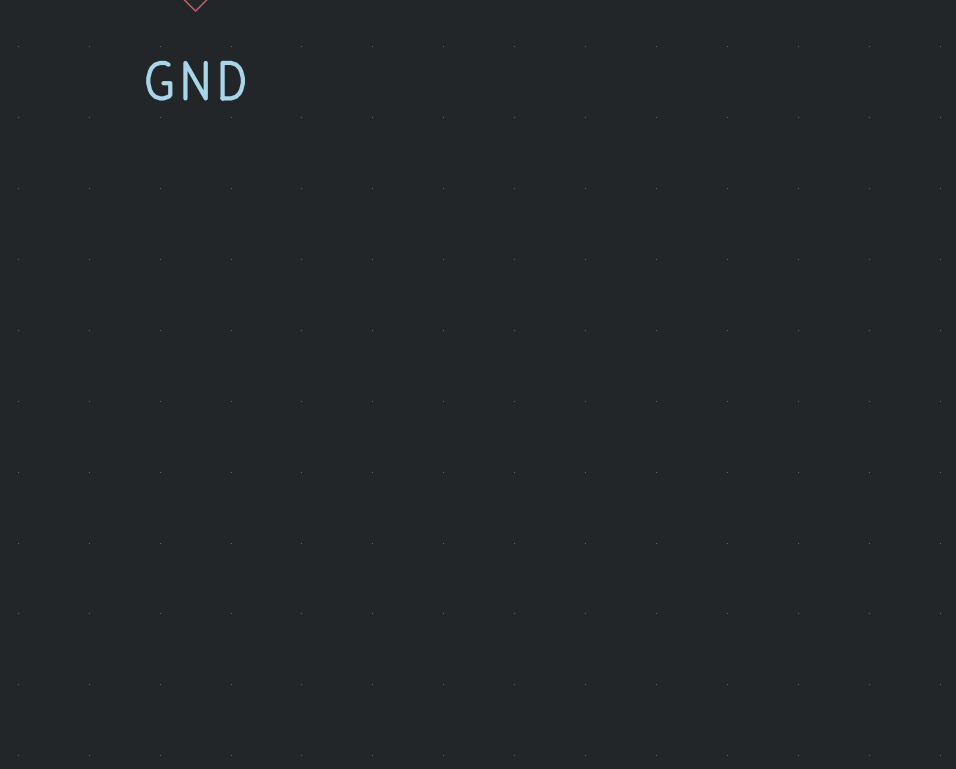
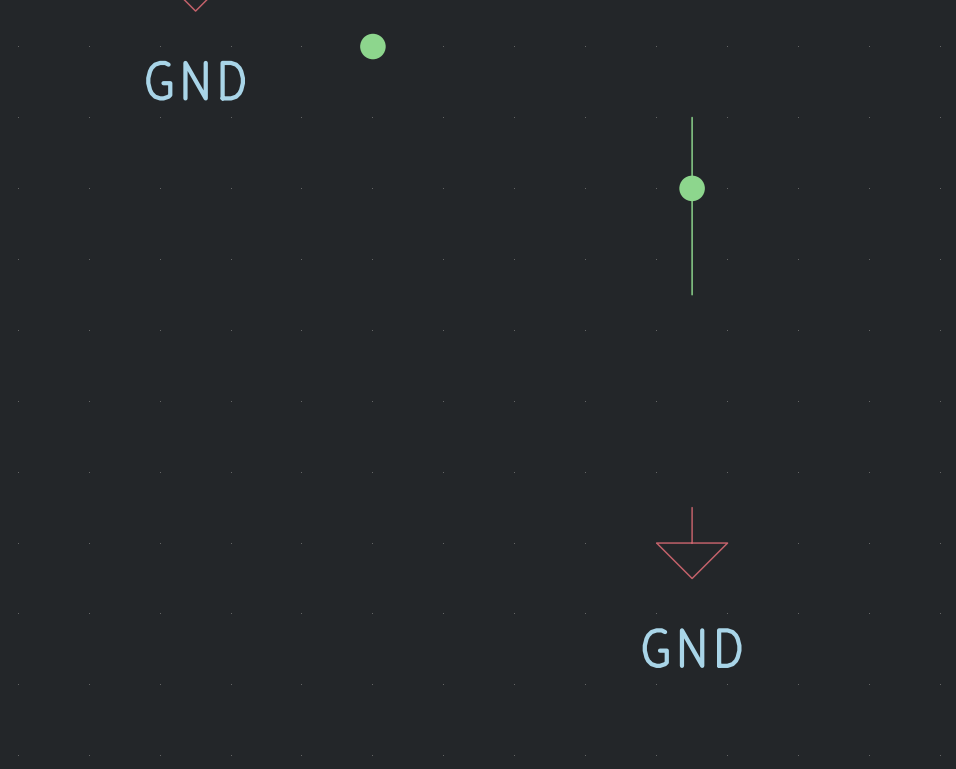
junction: none -> (372, 46)
wire: none -> (692, 117) (692, 294)
junction: none -> (692, 188)
power symbol: none -> GND (692, 543)

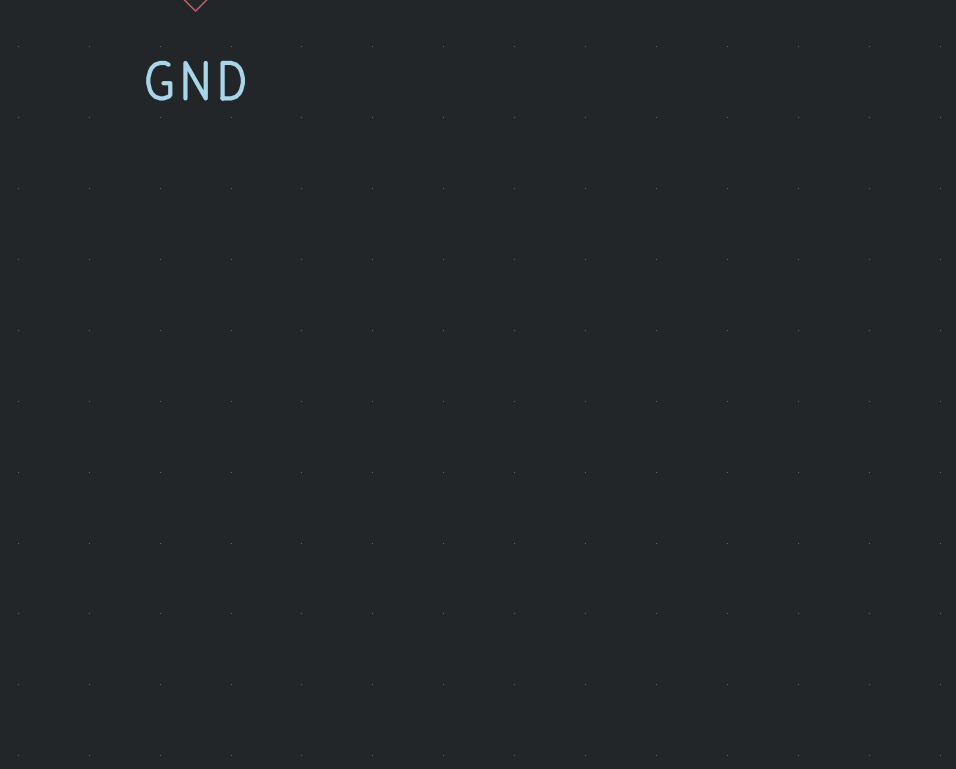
junction: (372, 46) -> none
wire: (692, 117) (692, 294) -> none
junction: (692, 188) -> none
power symbol: GND (692, 543) -> none

